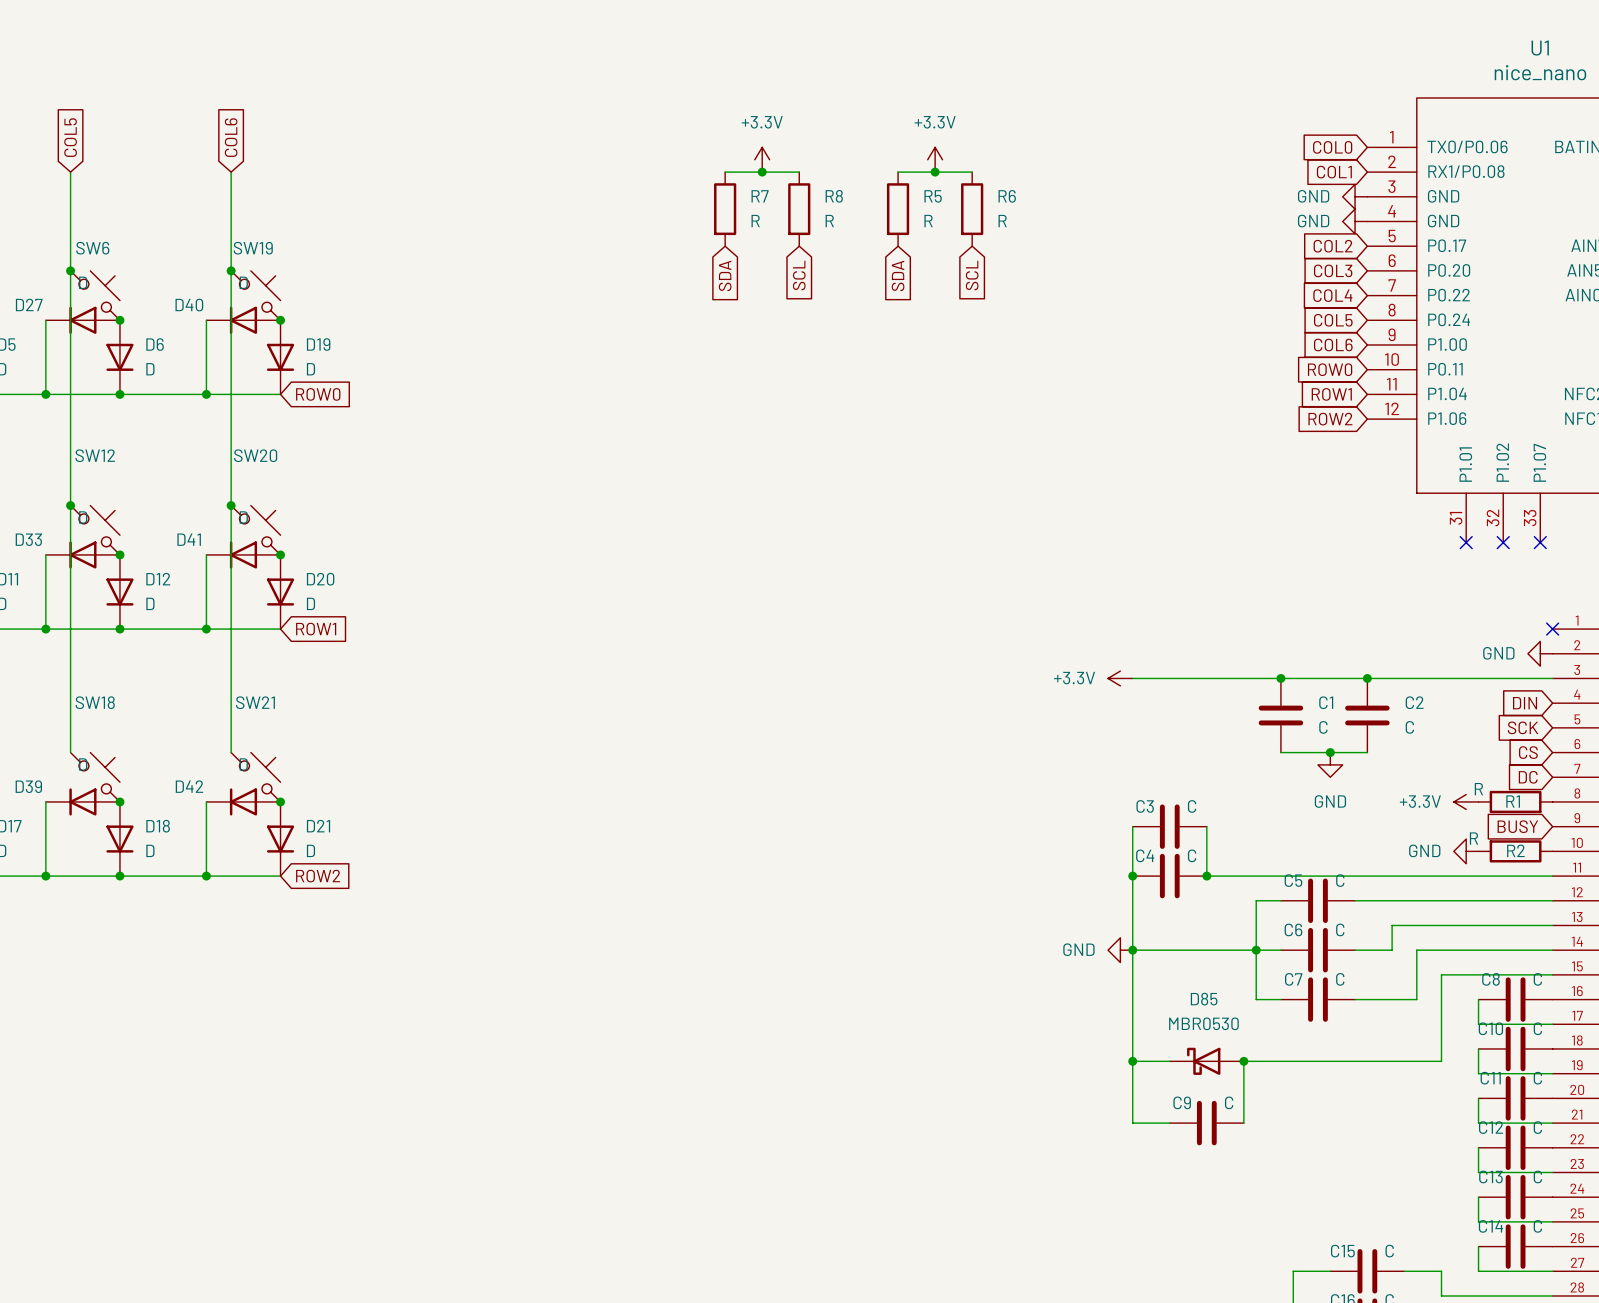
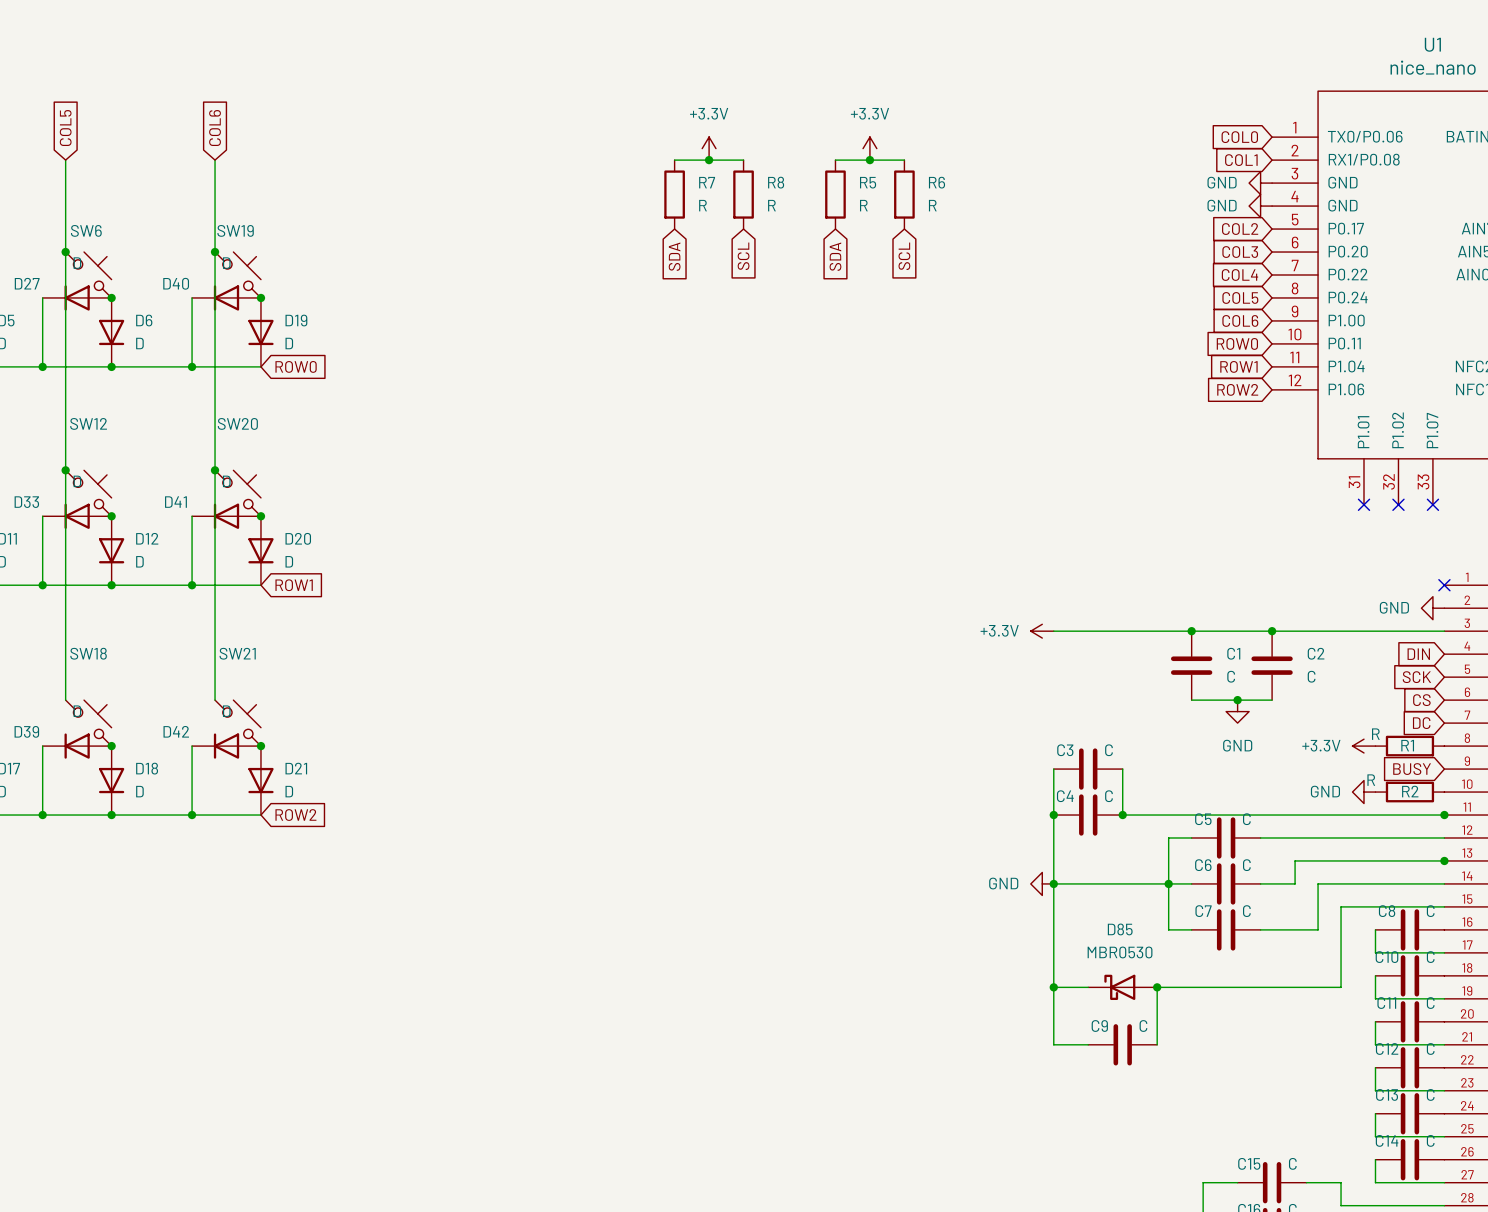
junction: none -> (1444, 815)
junction: none -> (1444, 860)

